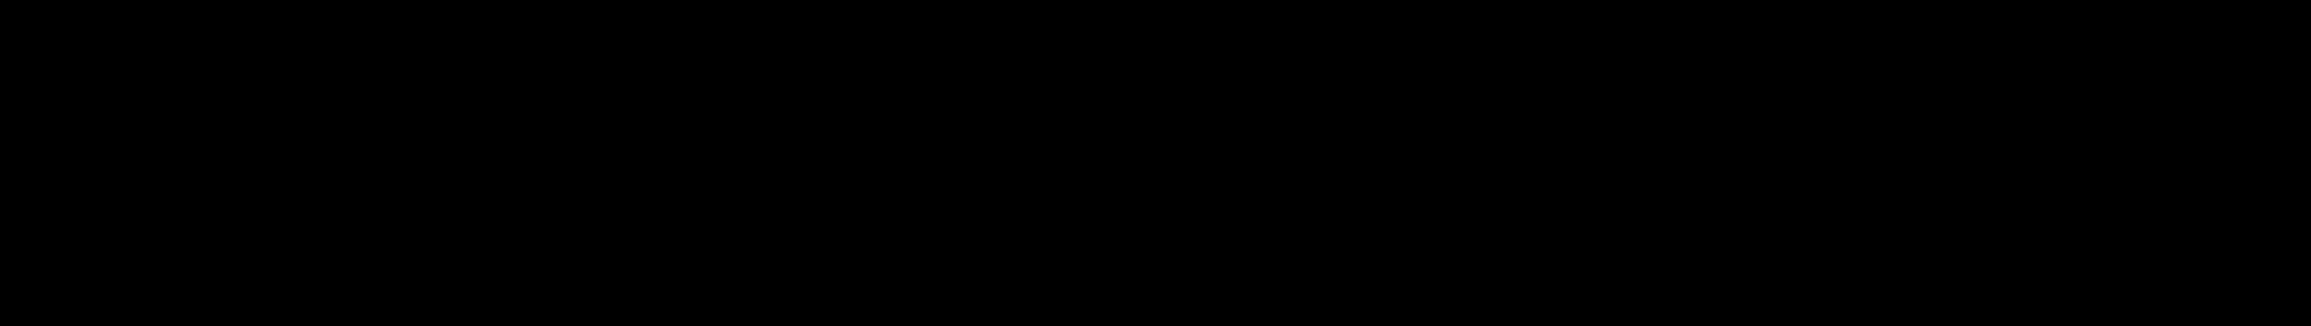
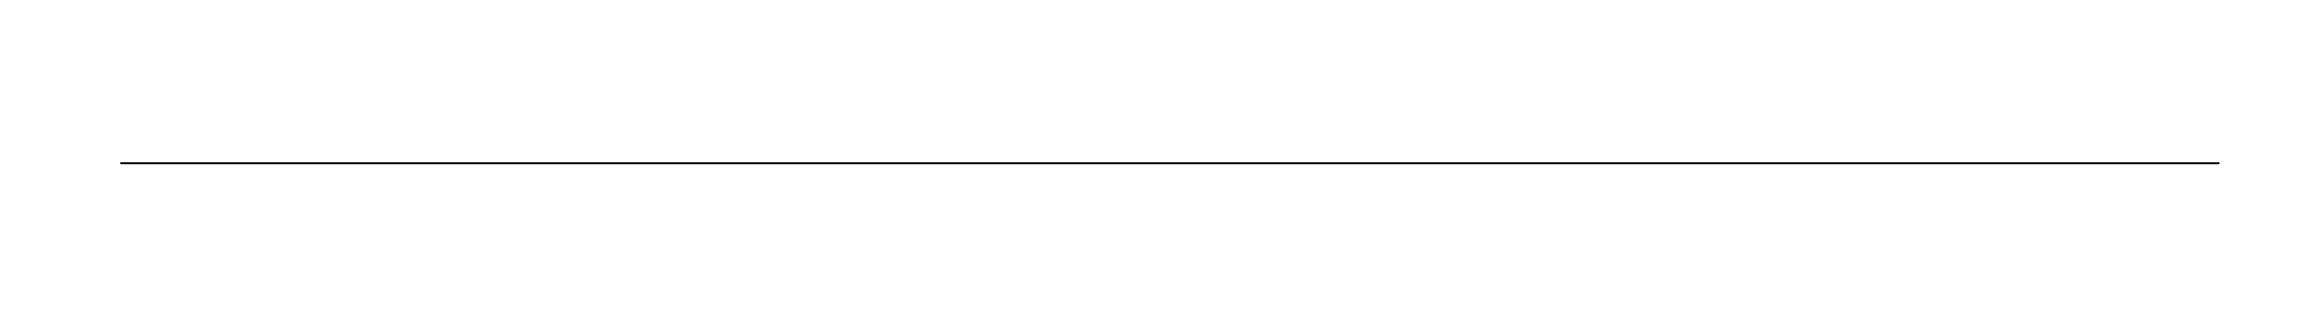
board edge: none -> (2218, 163) (121, 163)

